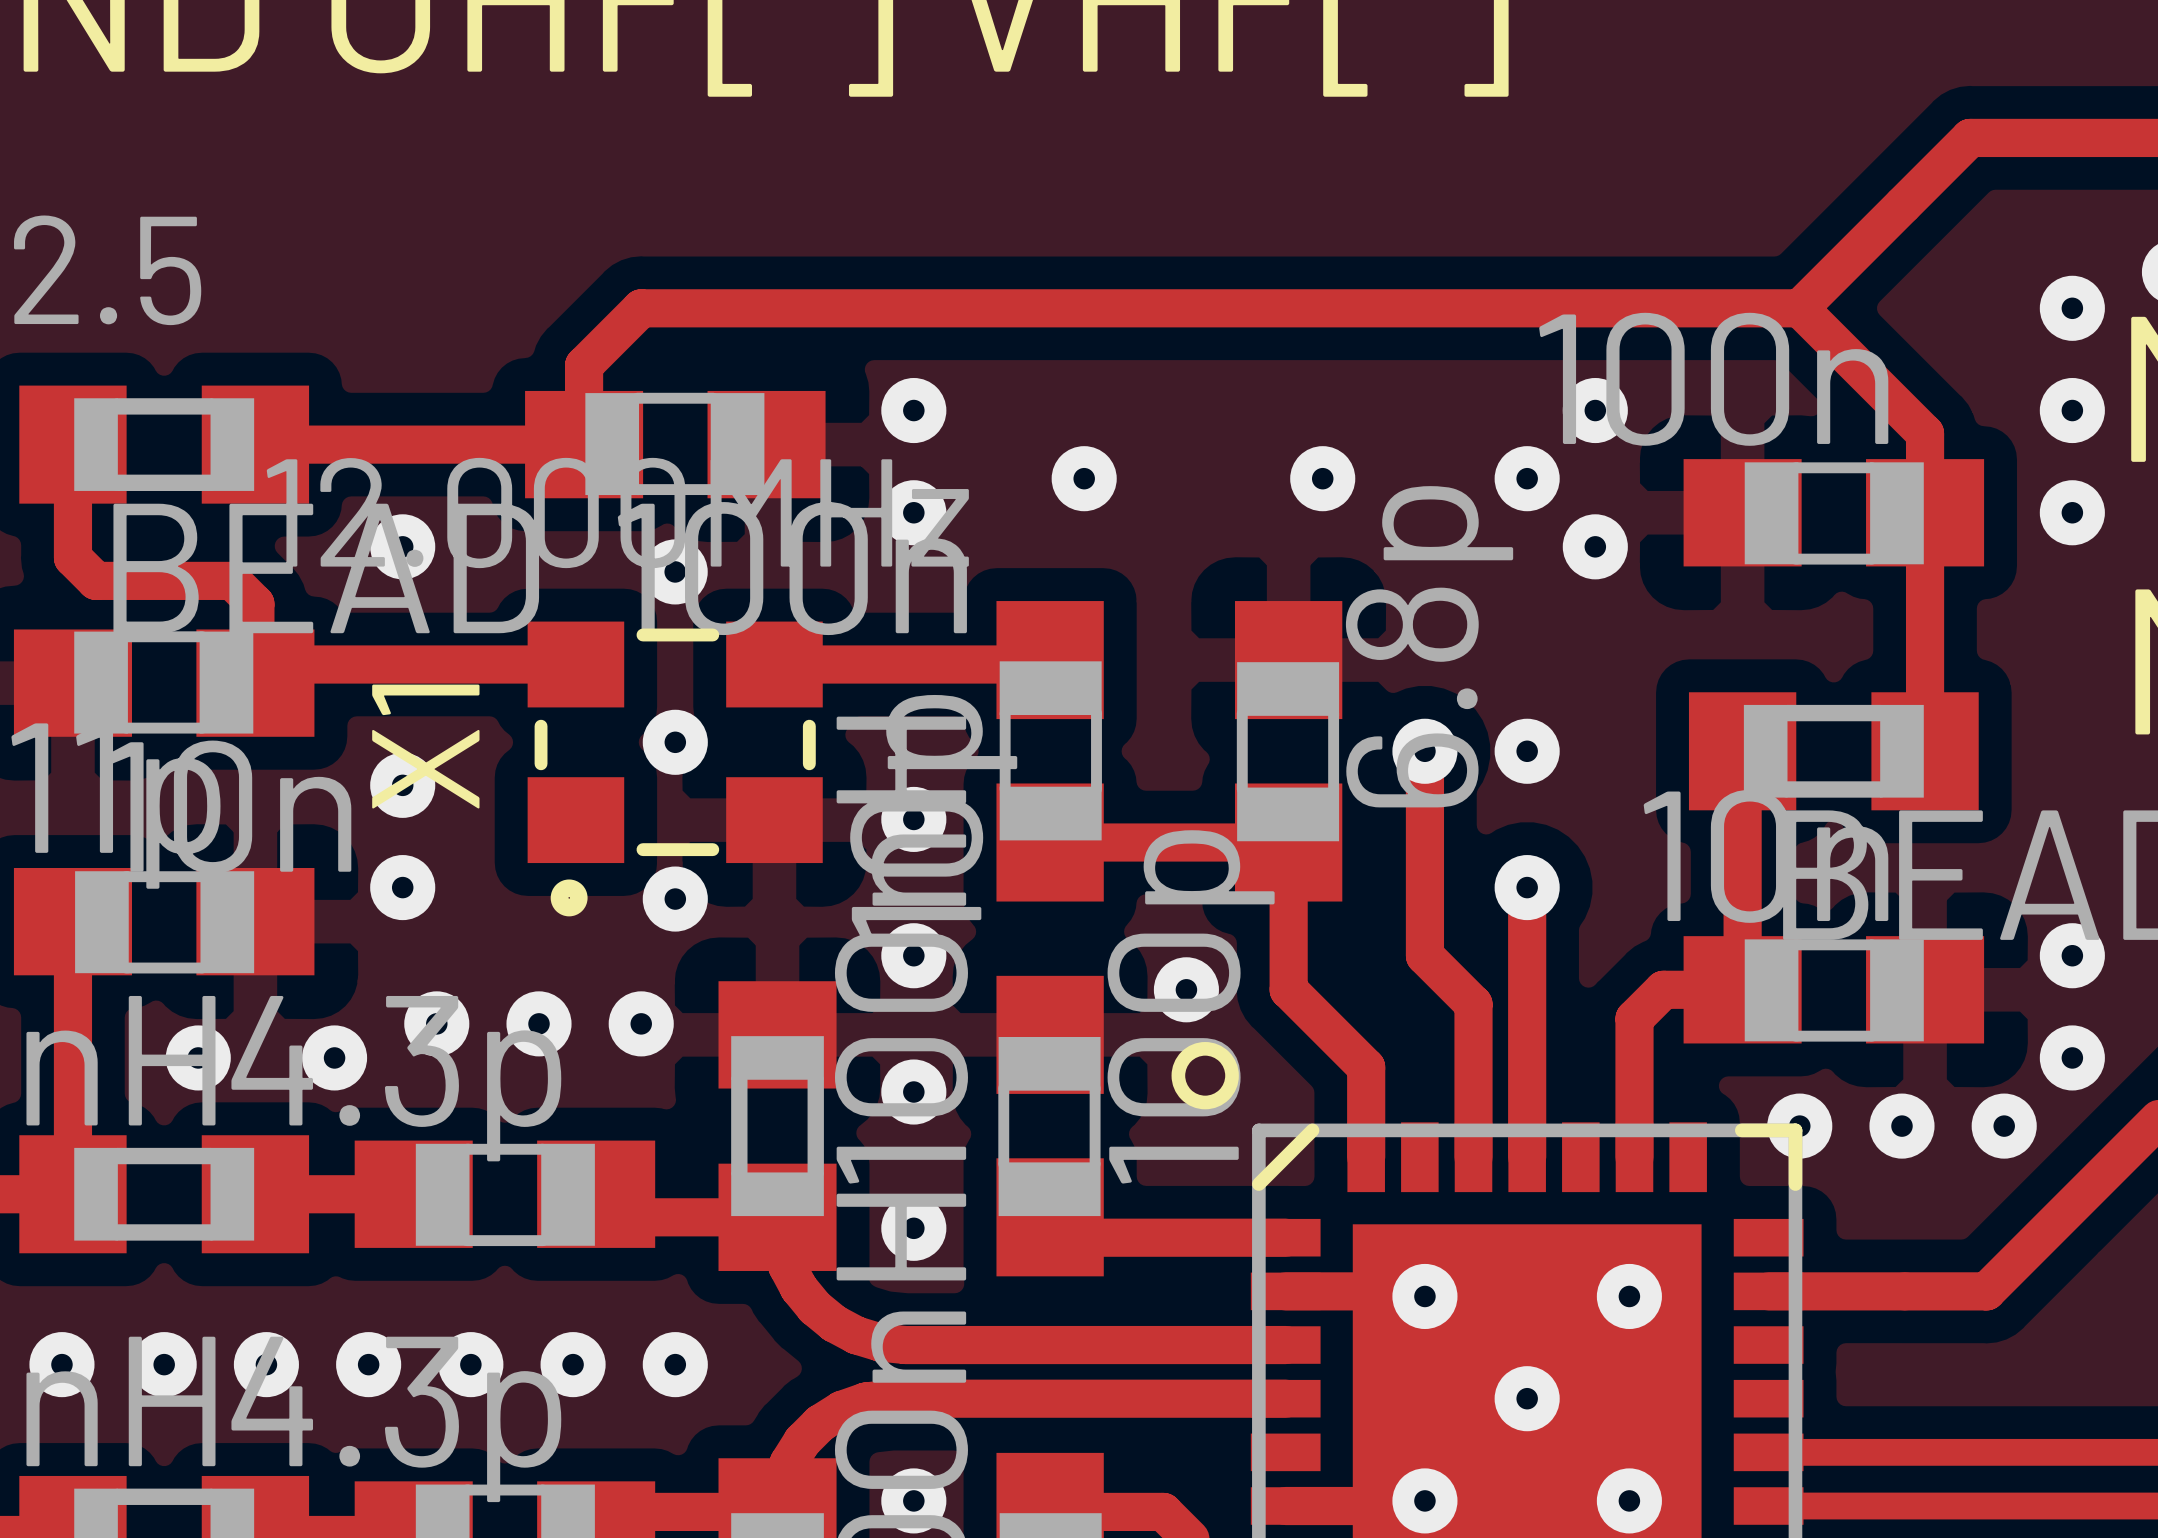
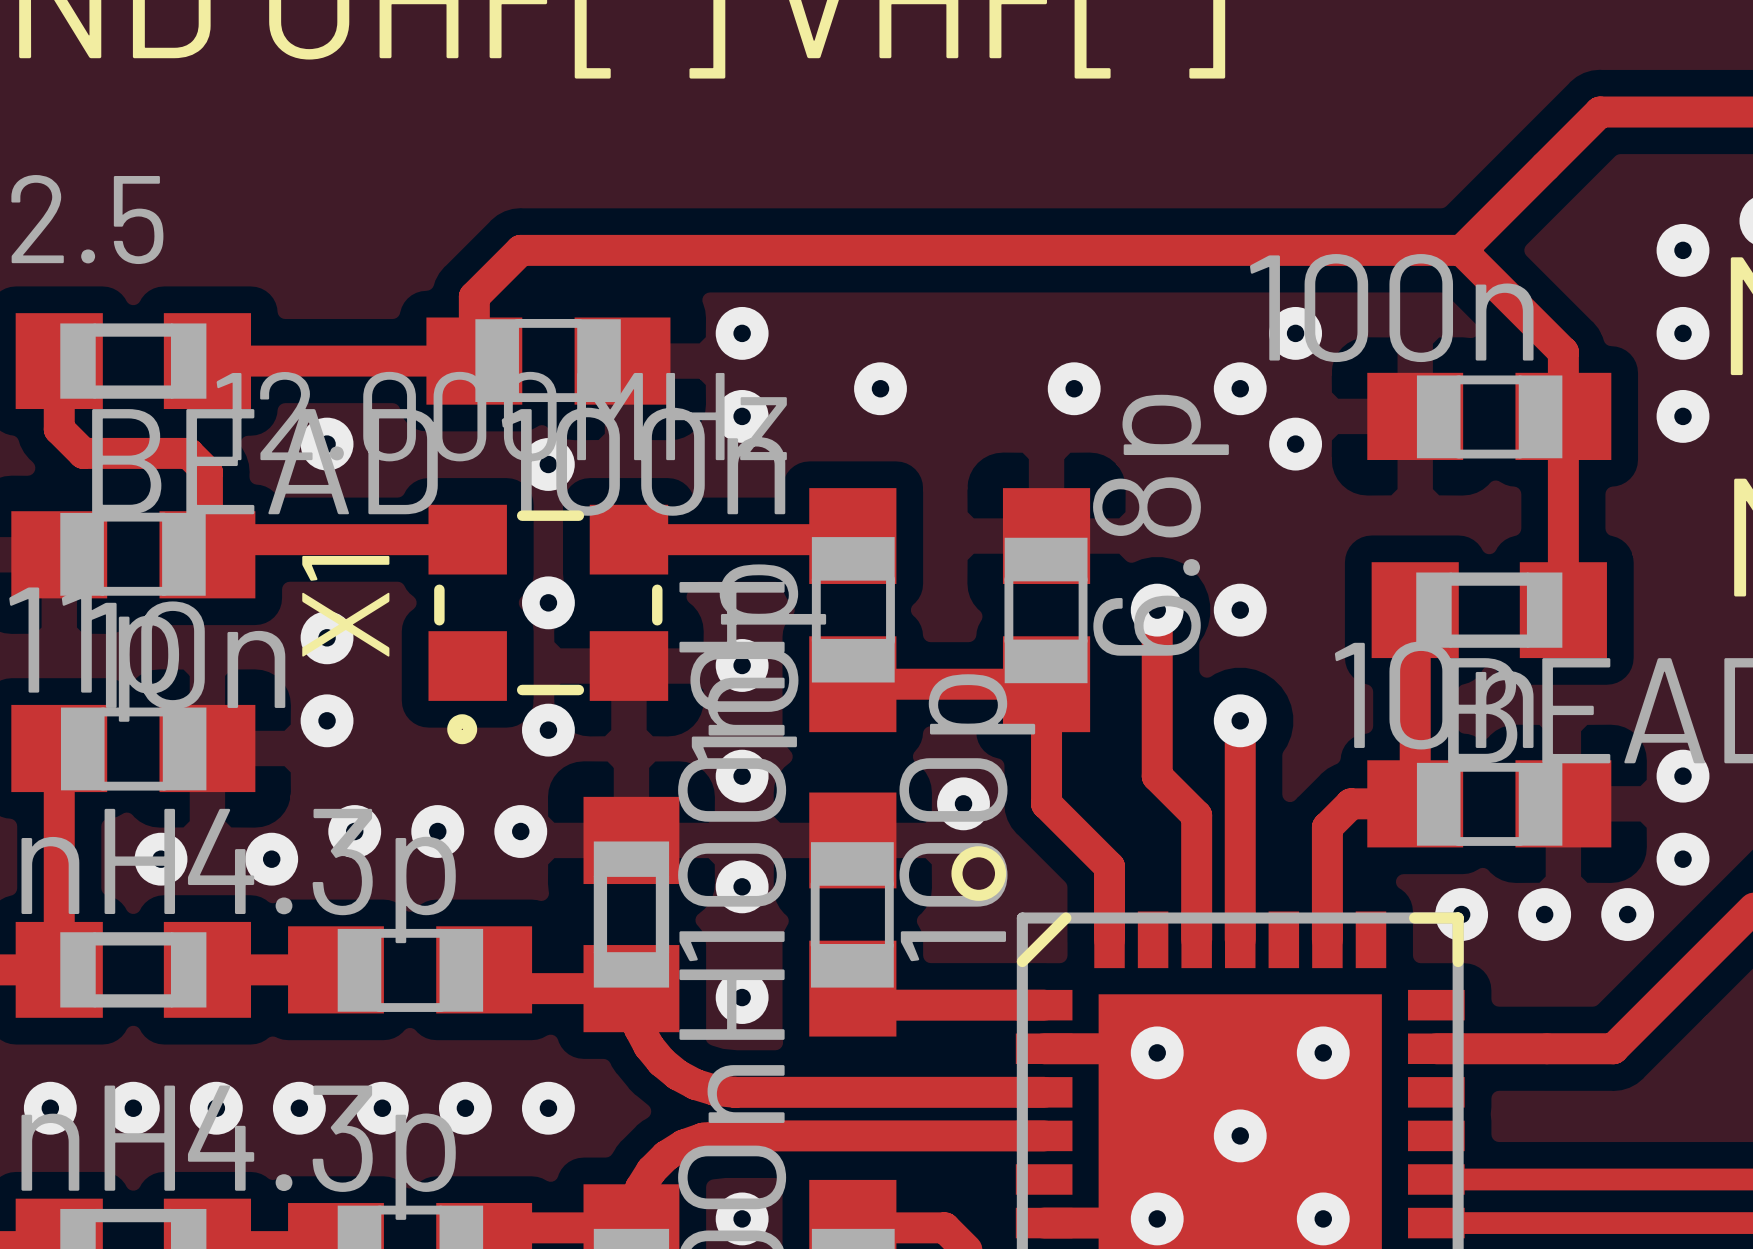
track: (72, 528) (72, 557) (96, 580) (232, 580) (255, 603) -> (59, 429) (83, 453) (188, 453) (207, 472) (207, 490)

